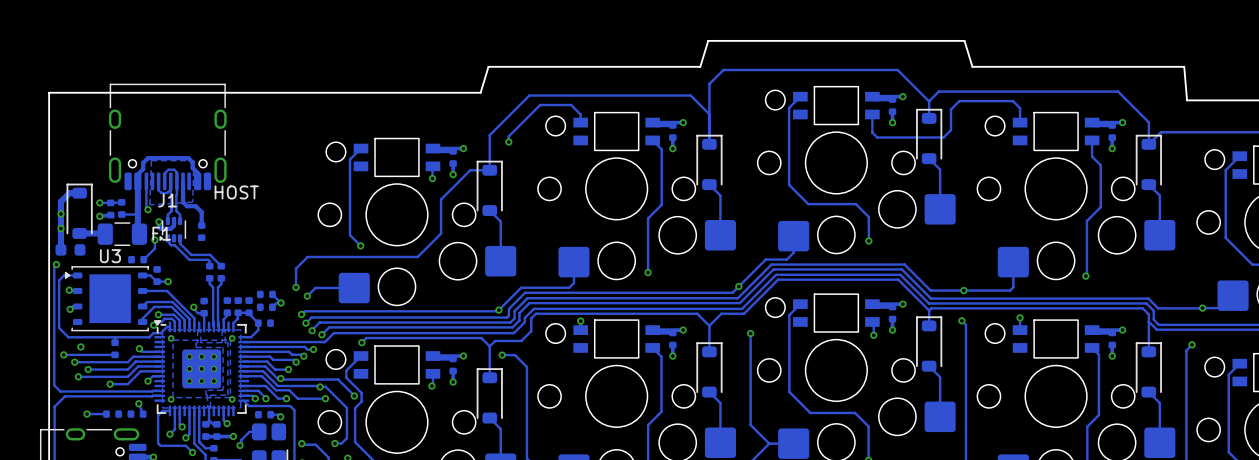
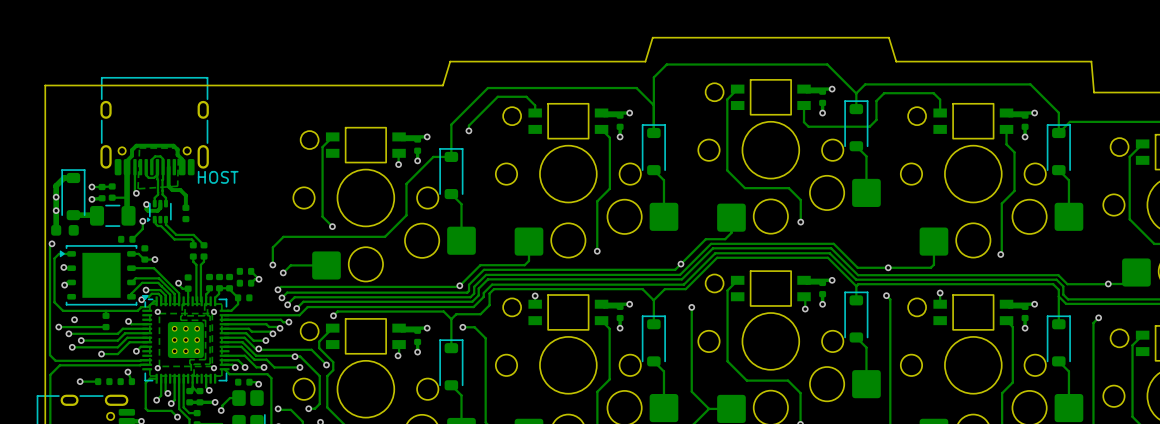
J1 name: J1 (167, 200) -> none
F1 name: F1 (161, 233) -> none
U3 name: U3 (110, 256) -> none

